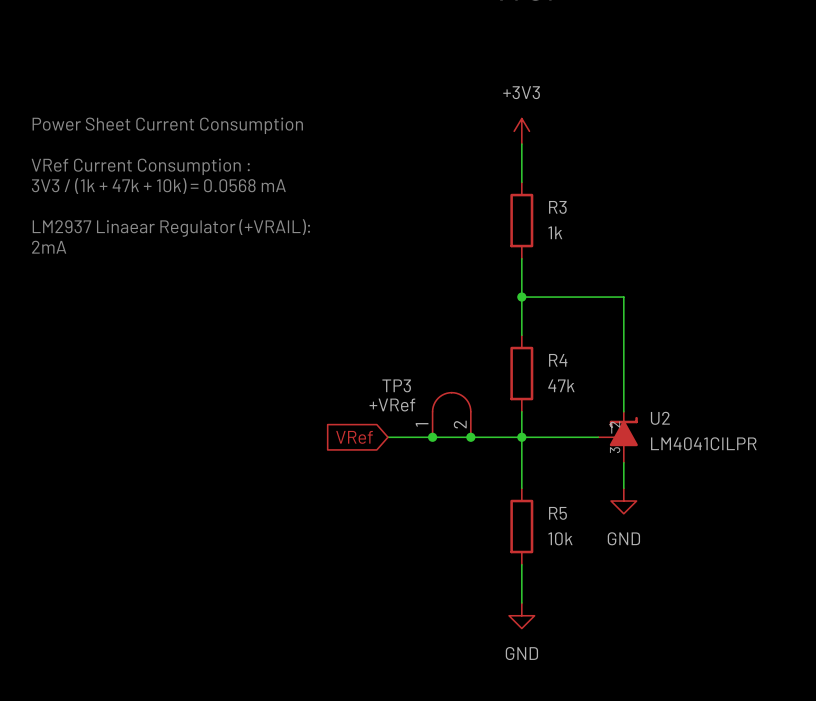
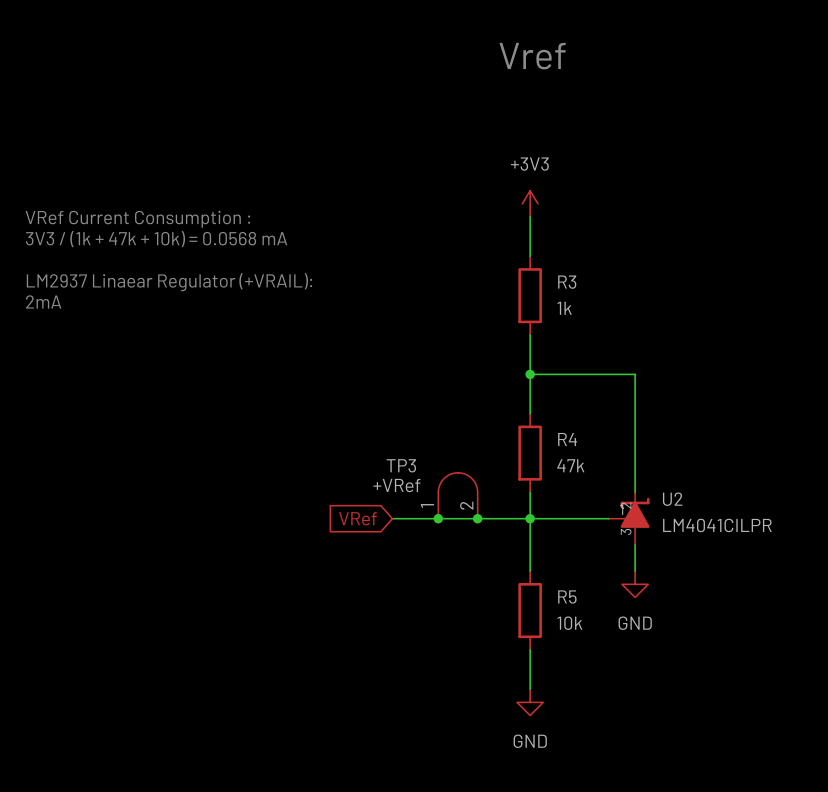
text: Power Sheet Current Consumption (167, 125) -> VRef Current Consumption : (137, 219)
text: VRef Current Consumption : (140, 166) -> 3V3 / (1k + 47k + 10k) = 0.0568 mA (156, 239)
text: 3V3 / (1k + 47k + 10k) = 0.0568 mA (158, 186) -> none
text: none -> LM2937 Linaear Regulator (+VRAIL): (169, 282)
text: LM2937 Linaear Regulator (+VRAIL): (171, 227) -> 2mA (43, 301)
text: 2mA (49, 247) -> none

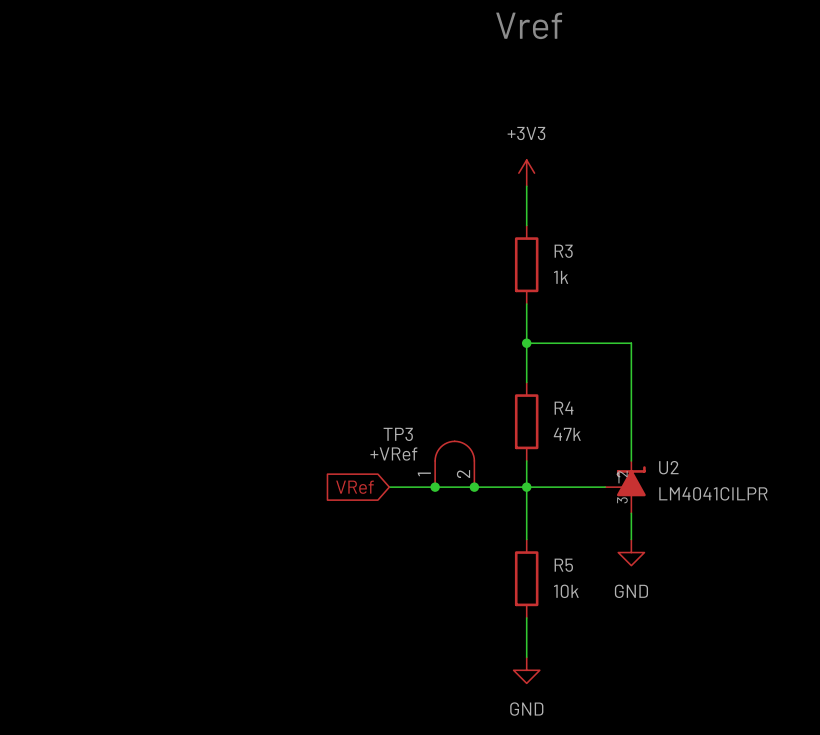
text: VRef Current Consumption : (137, 219) -> none
text: 3V3 / (1k + 47k + 10k) = 0.0568 mA (156, 239) -> none
text: LM2937 Linaear Regulator (+VRAIL): (169, 282) -> none
text: 2mA (43, 301) -> none

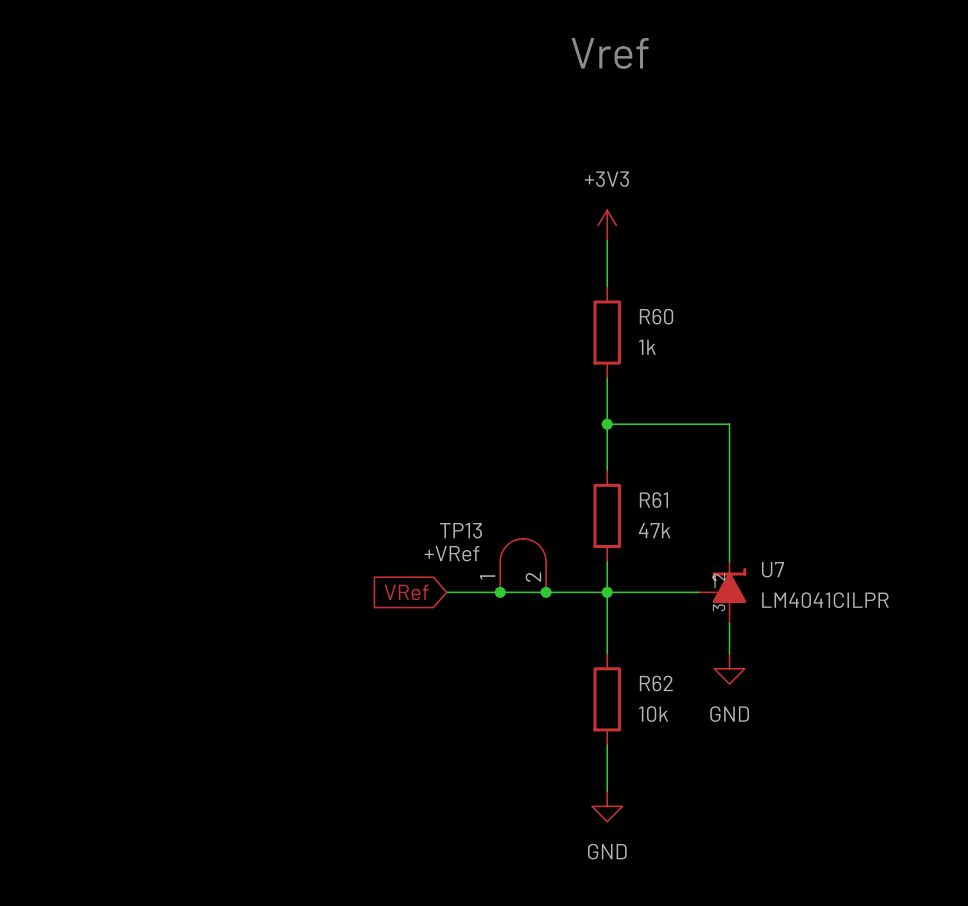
R3 name: R3 (563, 251) -> R60 (656, 316)
R4 name: R4 (564, 408) -> R61 (653, 500)
TP3 name: TP3 (398, 434) -> TP13 (460, 530)
U2 name: U2 (668, 467) -> U7 (773, 569)
R5 name: R5 (563, 565) -> R62 (656, 683)

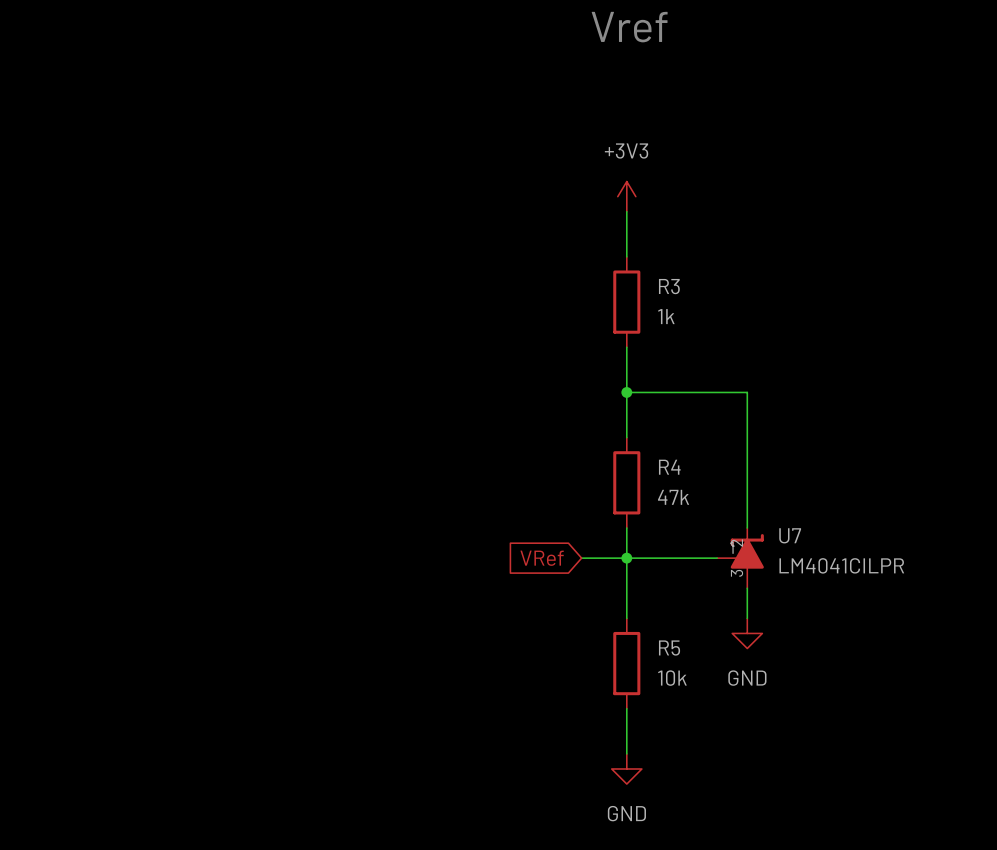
R60 name: R60 (656, 316) -> R3 (669, 286)
R61 name: R61 (653, 500) -> R4 (669, 467)
TP13: +VRef (523, 565) -> none
global label position: VRef (406, 592) -> VRef (542, 558)
wire: (446, 592) (561, 592) -> none
junction: (500, 592) -> none
junction: (546, 592) -> none
R62 name: R62 (656, 683) -> R5 (669, 648)

